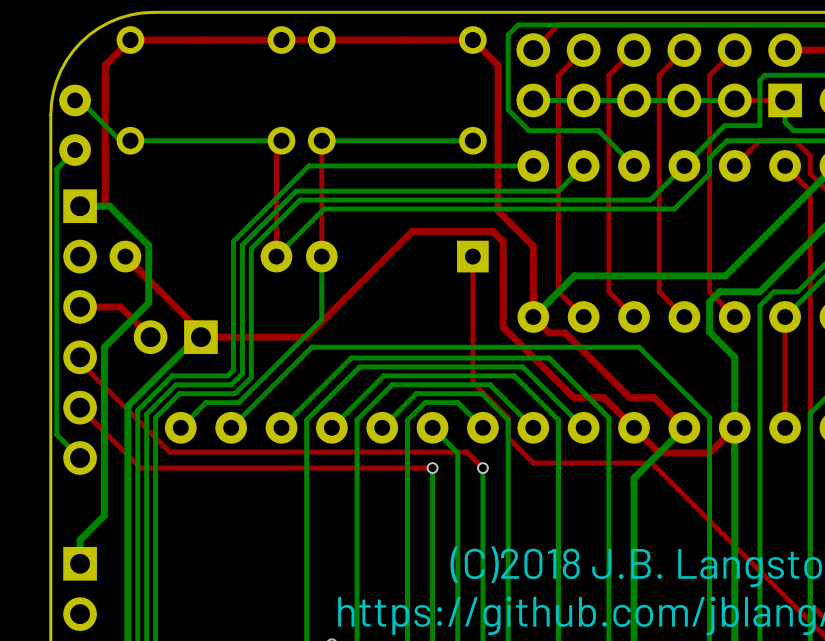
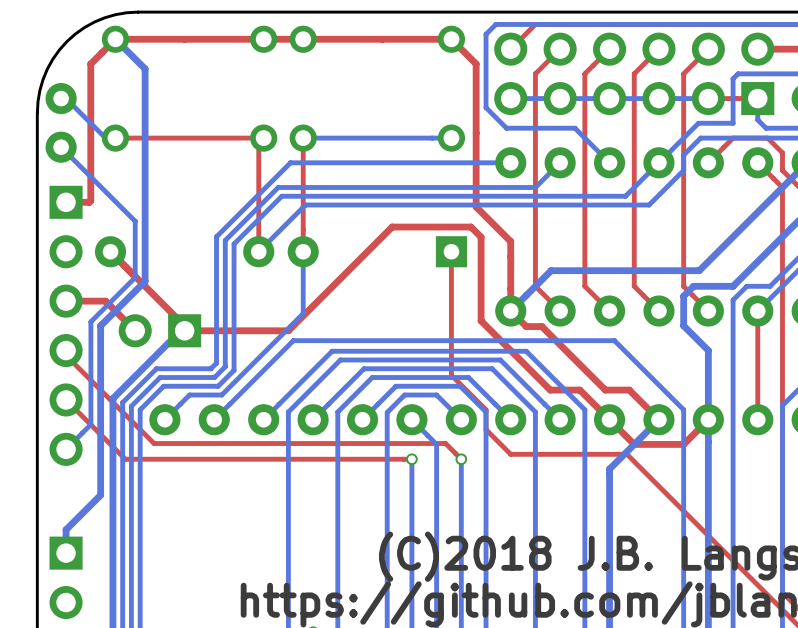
top track: none -> (263, 138) (115, 138)
bottom track: (281, 140) (130, 140) -> none
bottom track: (70, 155) (56, 169) (56, 434) (80, 458) -> (61, 147) (135, 221) (135, 277) (90, 321) (90, 424) (66, 449)
bottom track: (80, 206) (109, 206) (148, 245) (148, 303) (104, 347) (104, 515) -> (115, 39) (145, 68) (145, 281) (100, 325) (100, 495) (89, 505)

